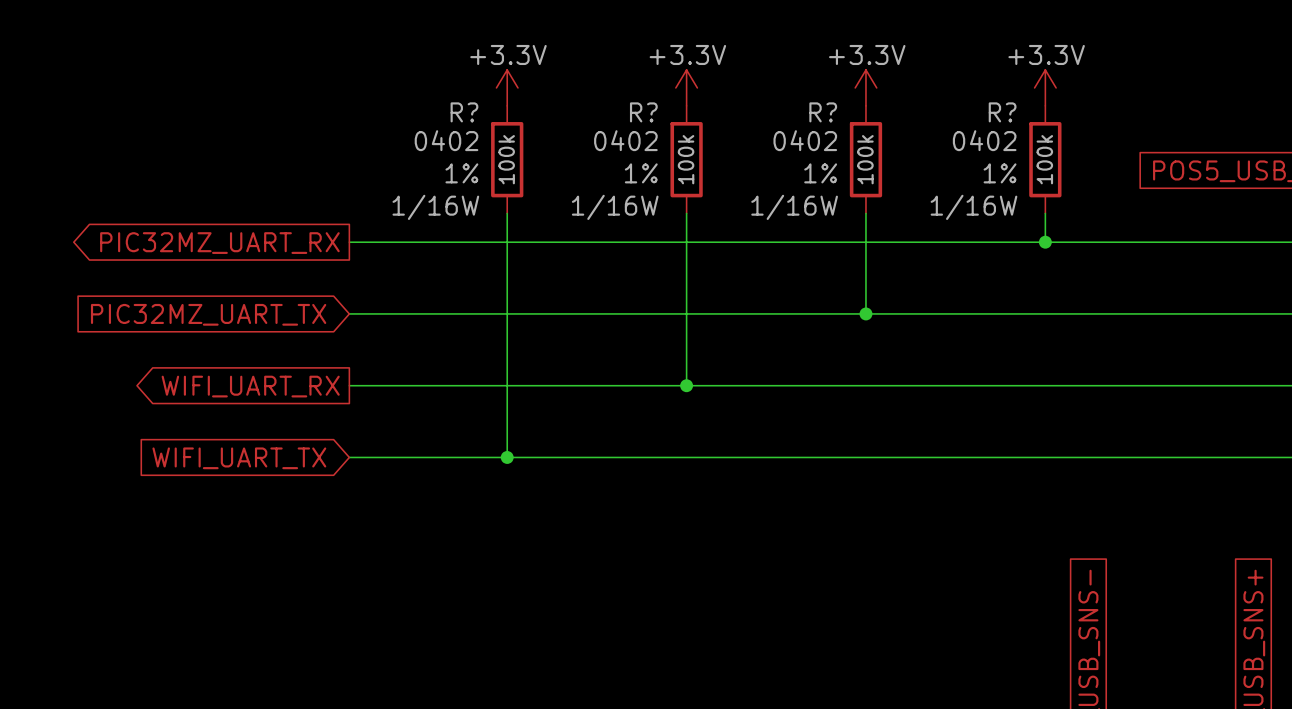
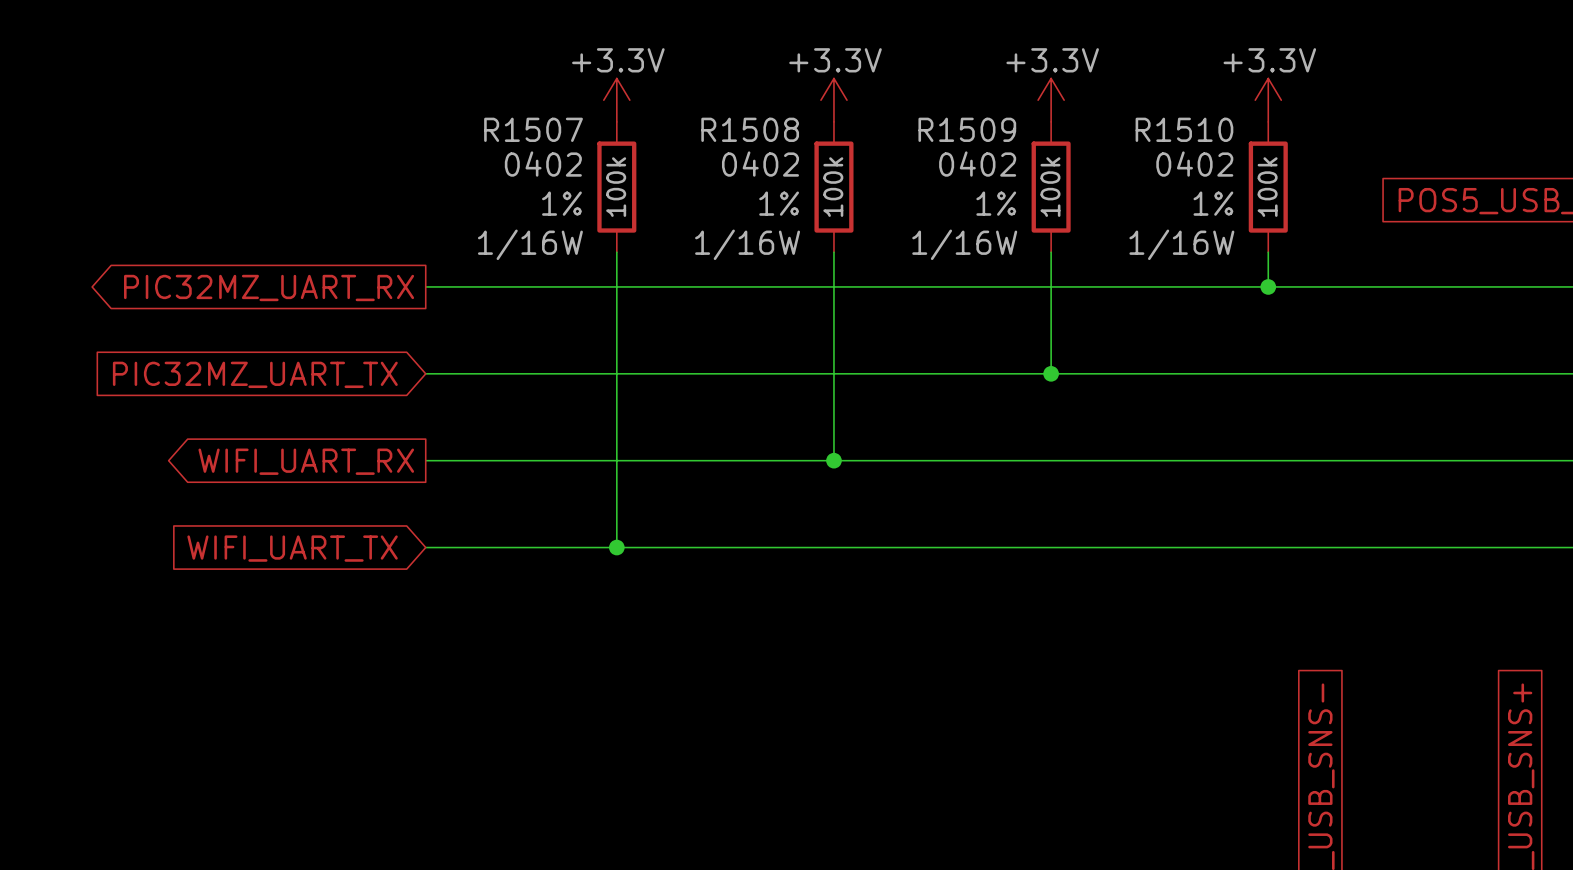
R? name: R? (464, 112) -> R1507 (533, 129)
R? name: R? (643, 112) -> R1508 (750, 129)
R? name: R? (823, 112) -> R1509 (967, 129)
R? name: R? (1002, 112) -> R1510 (1184, 129)

